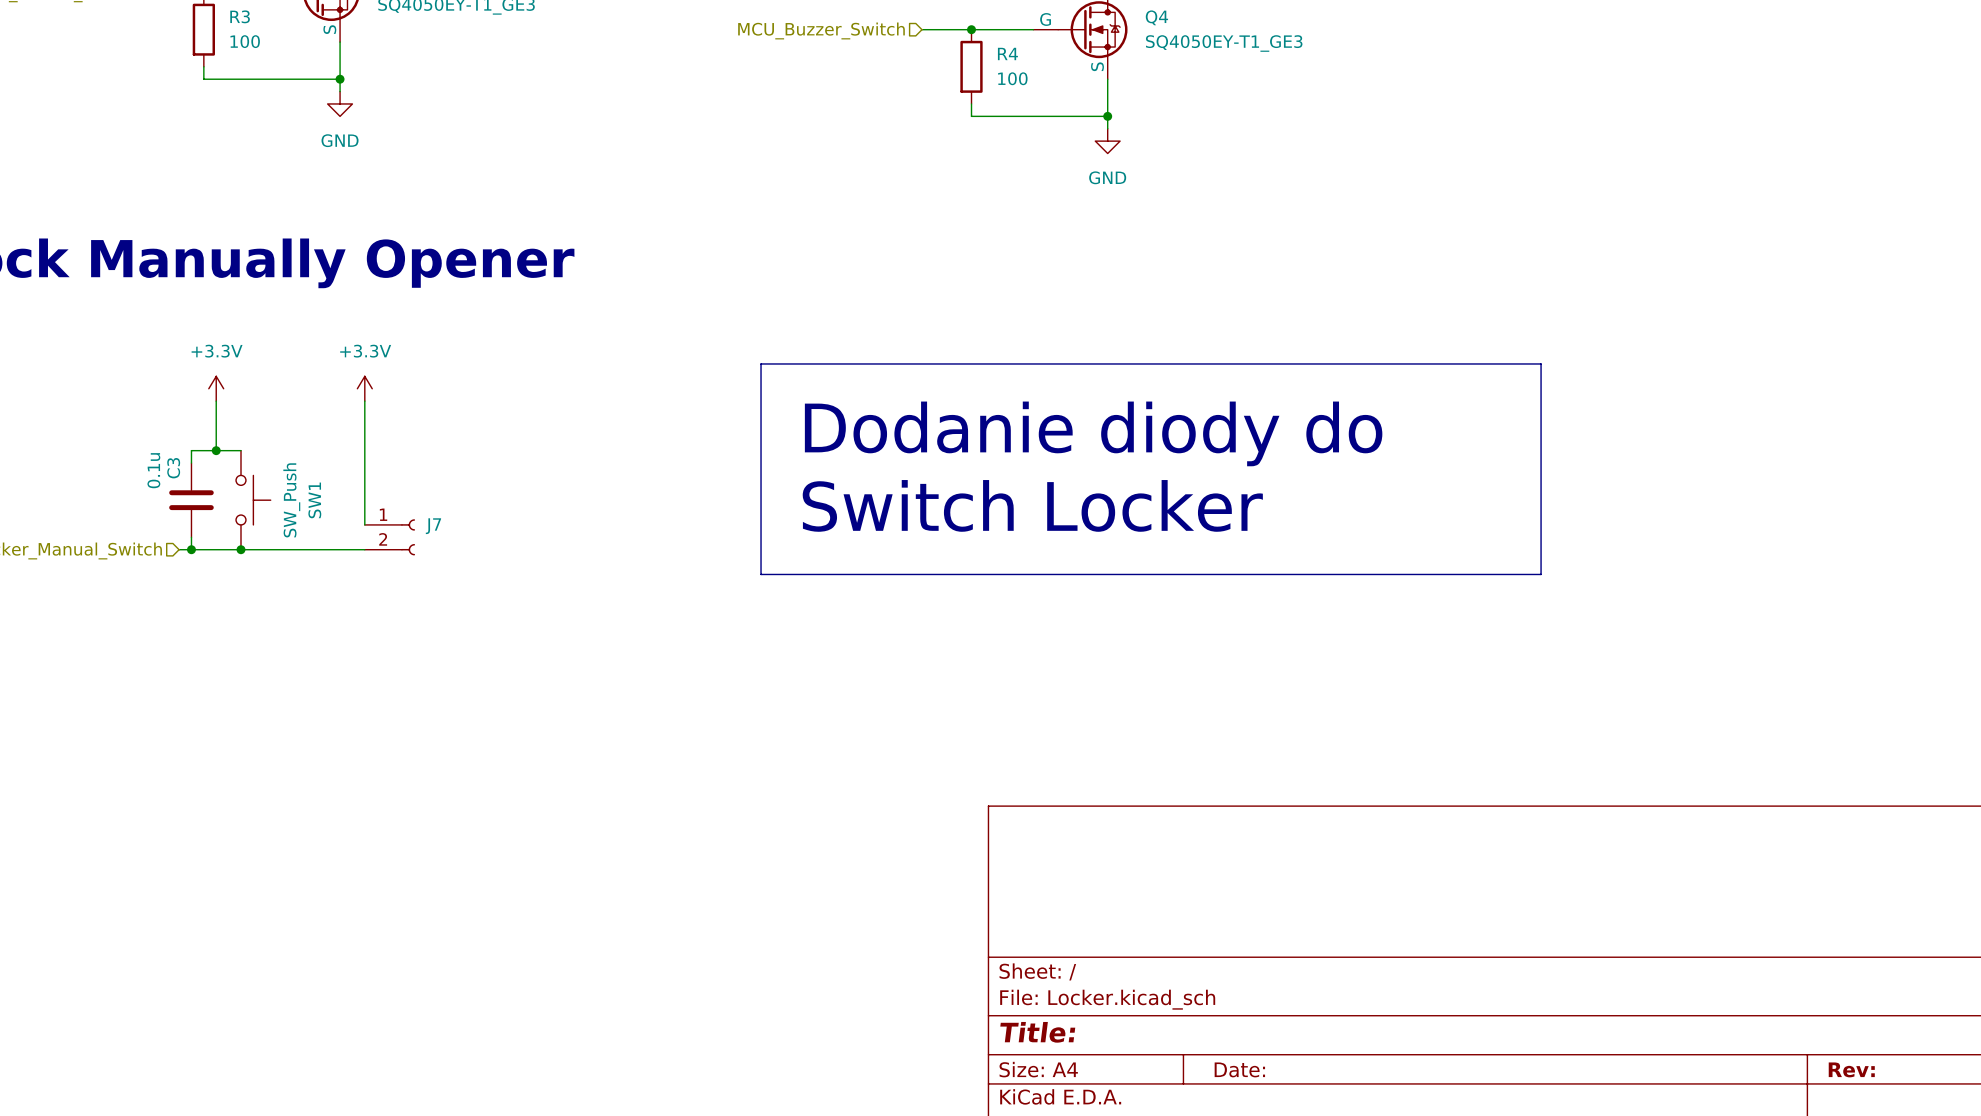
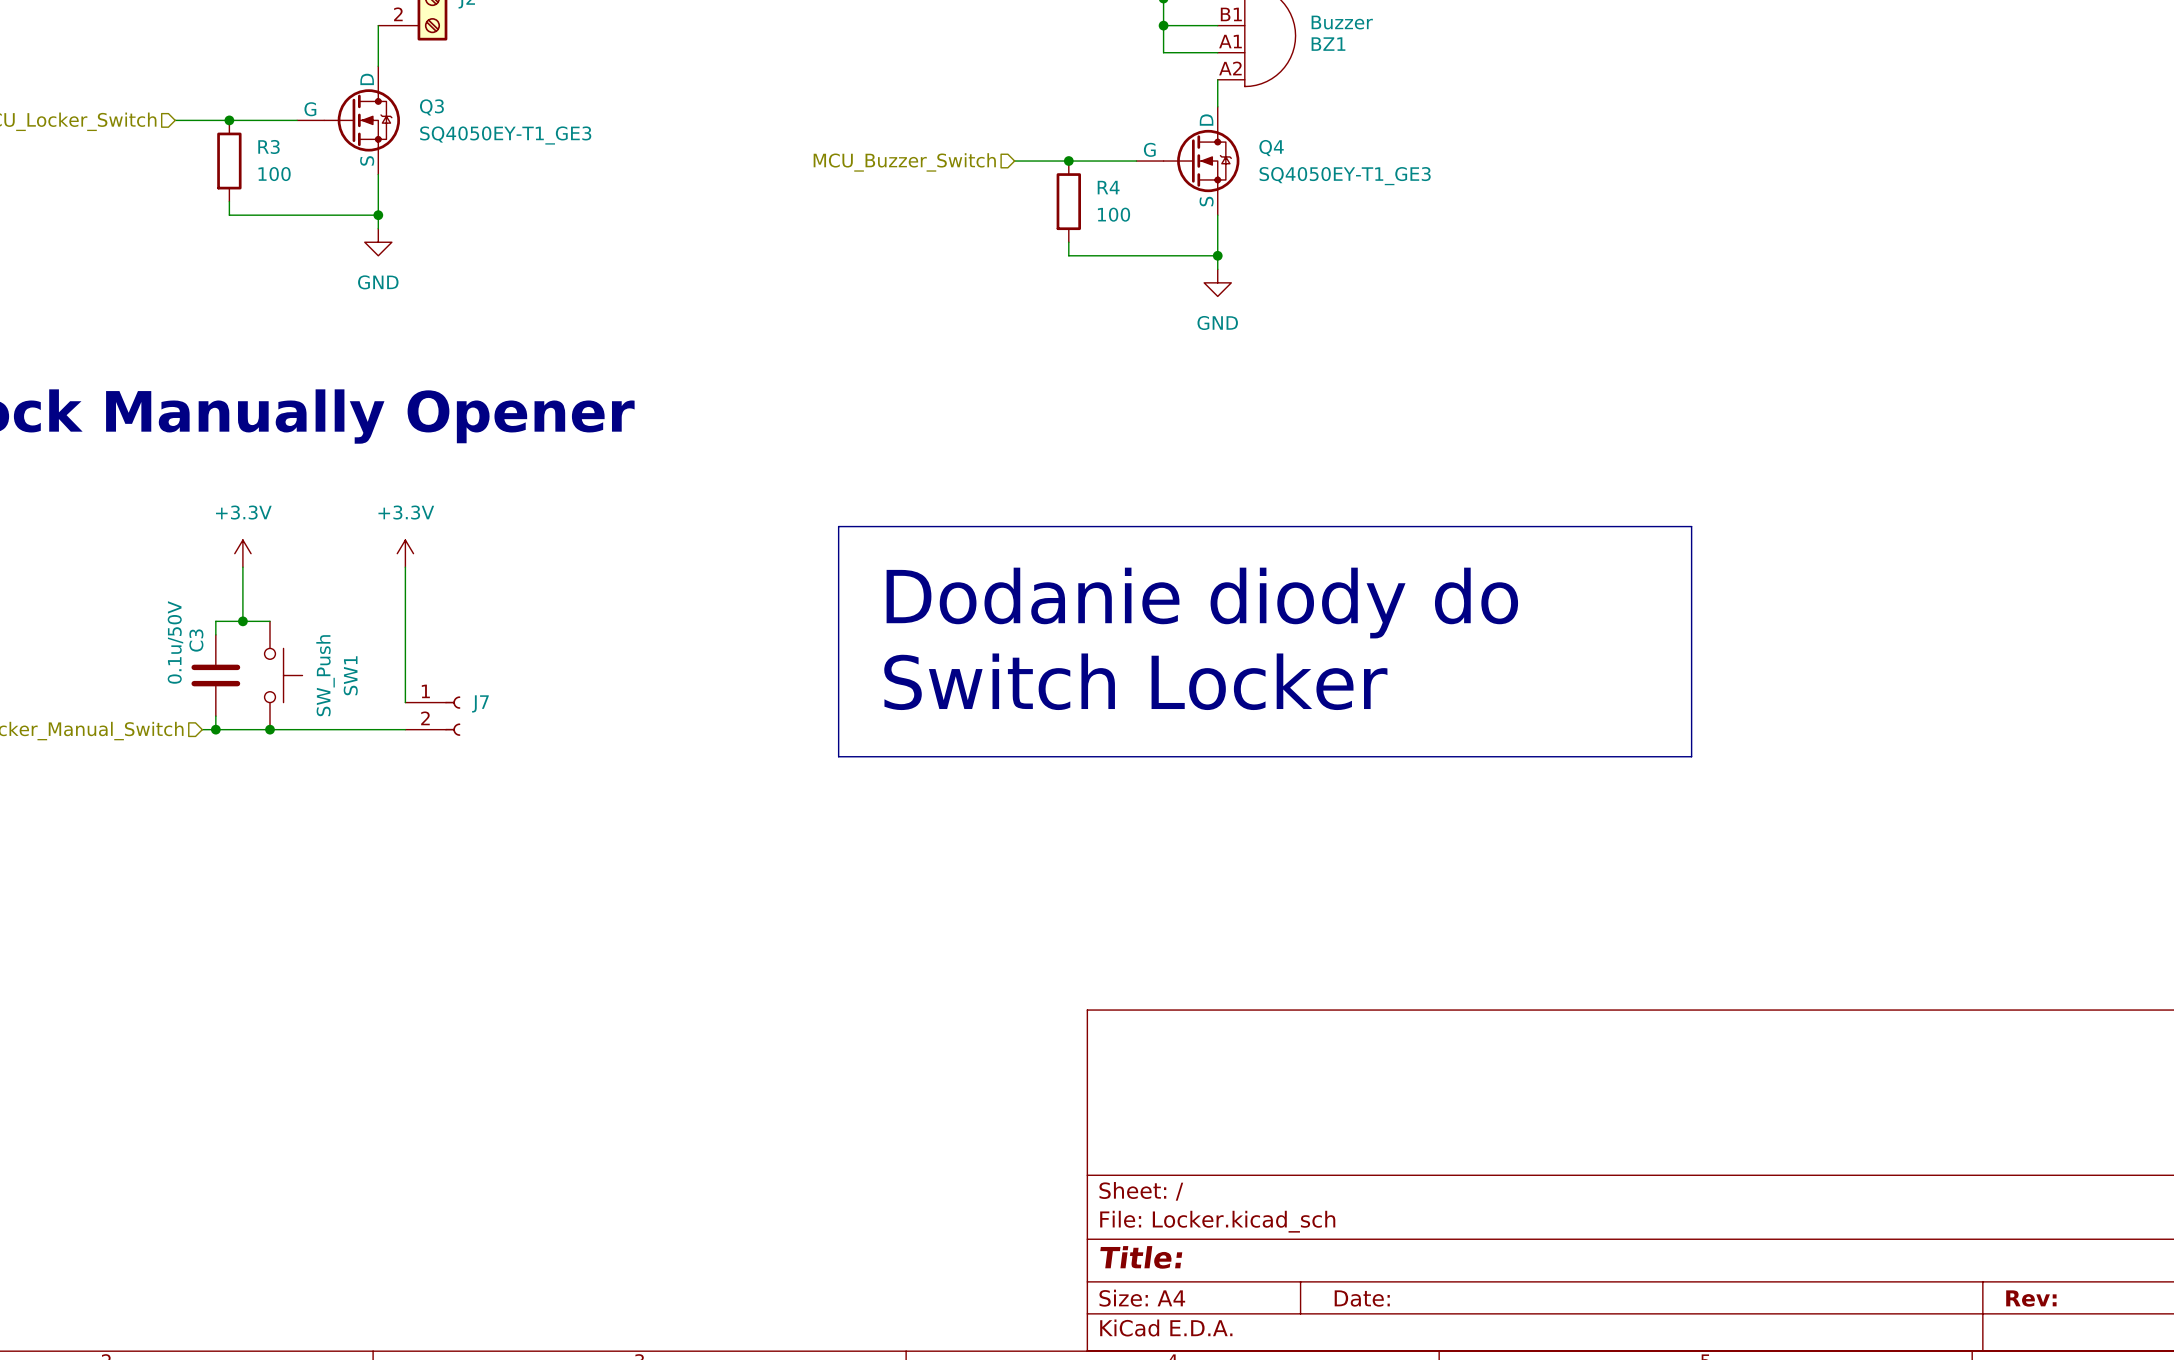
C3 value: 0.1u (153, 470) -> 0.1u/50V (175, 642)

